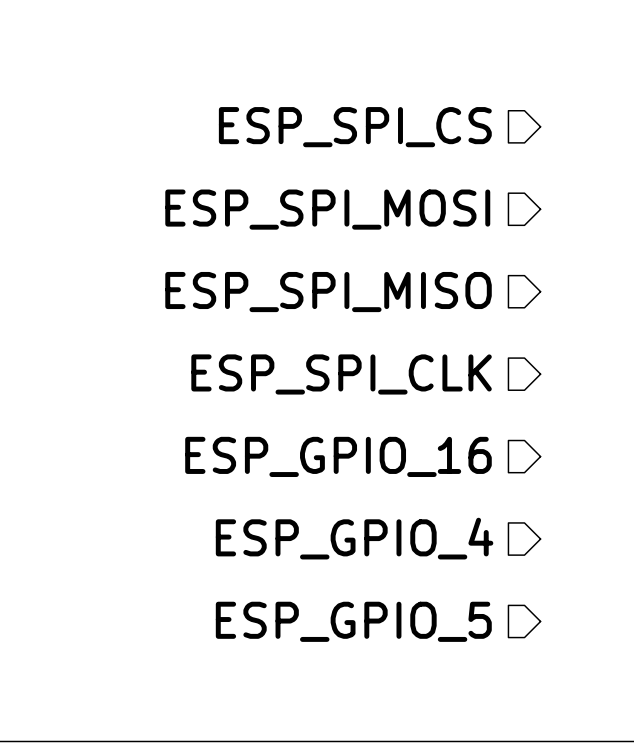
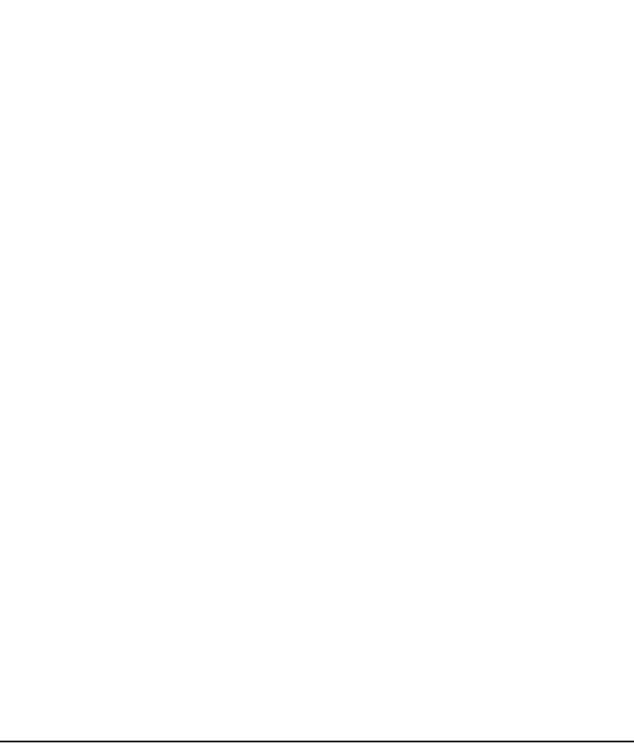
hierarchical label: ESP_SPI_CS (355, 127) -> none
hierarchical label: ESP_SPI_MOSI (327, 209) -> none
hierarchical label: ESP_SPI_MISO (328, 292) -> none
hierarchical label: ESP_SPI_CLK (341, 374) -> none
hierarchical label: ESP_GPIO_16 (338, 456) -> none
hierarchical label: ESP_GPIO_4 (354, 538) -> none
hierarchical label: ESP_GPIO_5 (353, 621) -> none

